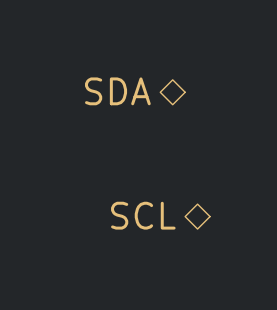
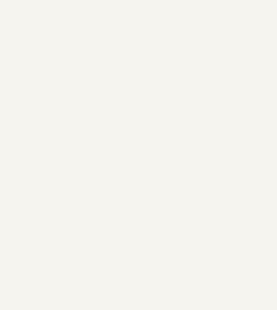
hierarchical label: SDA (117, 91) -> none
hierarchical label: SCL (143, 215) -> none

